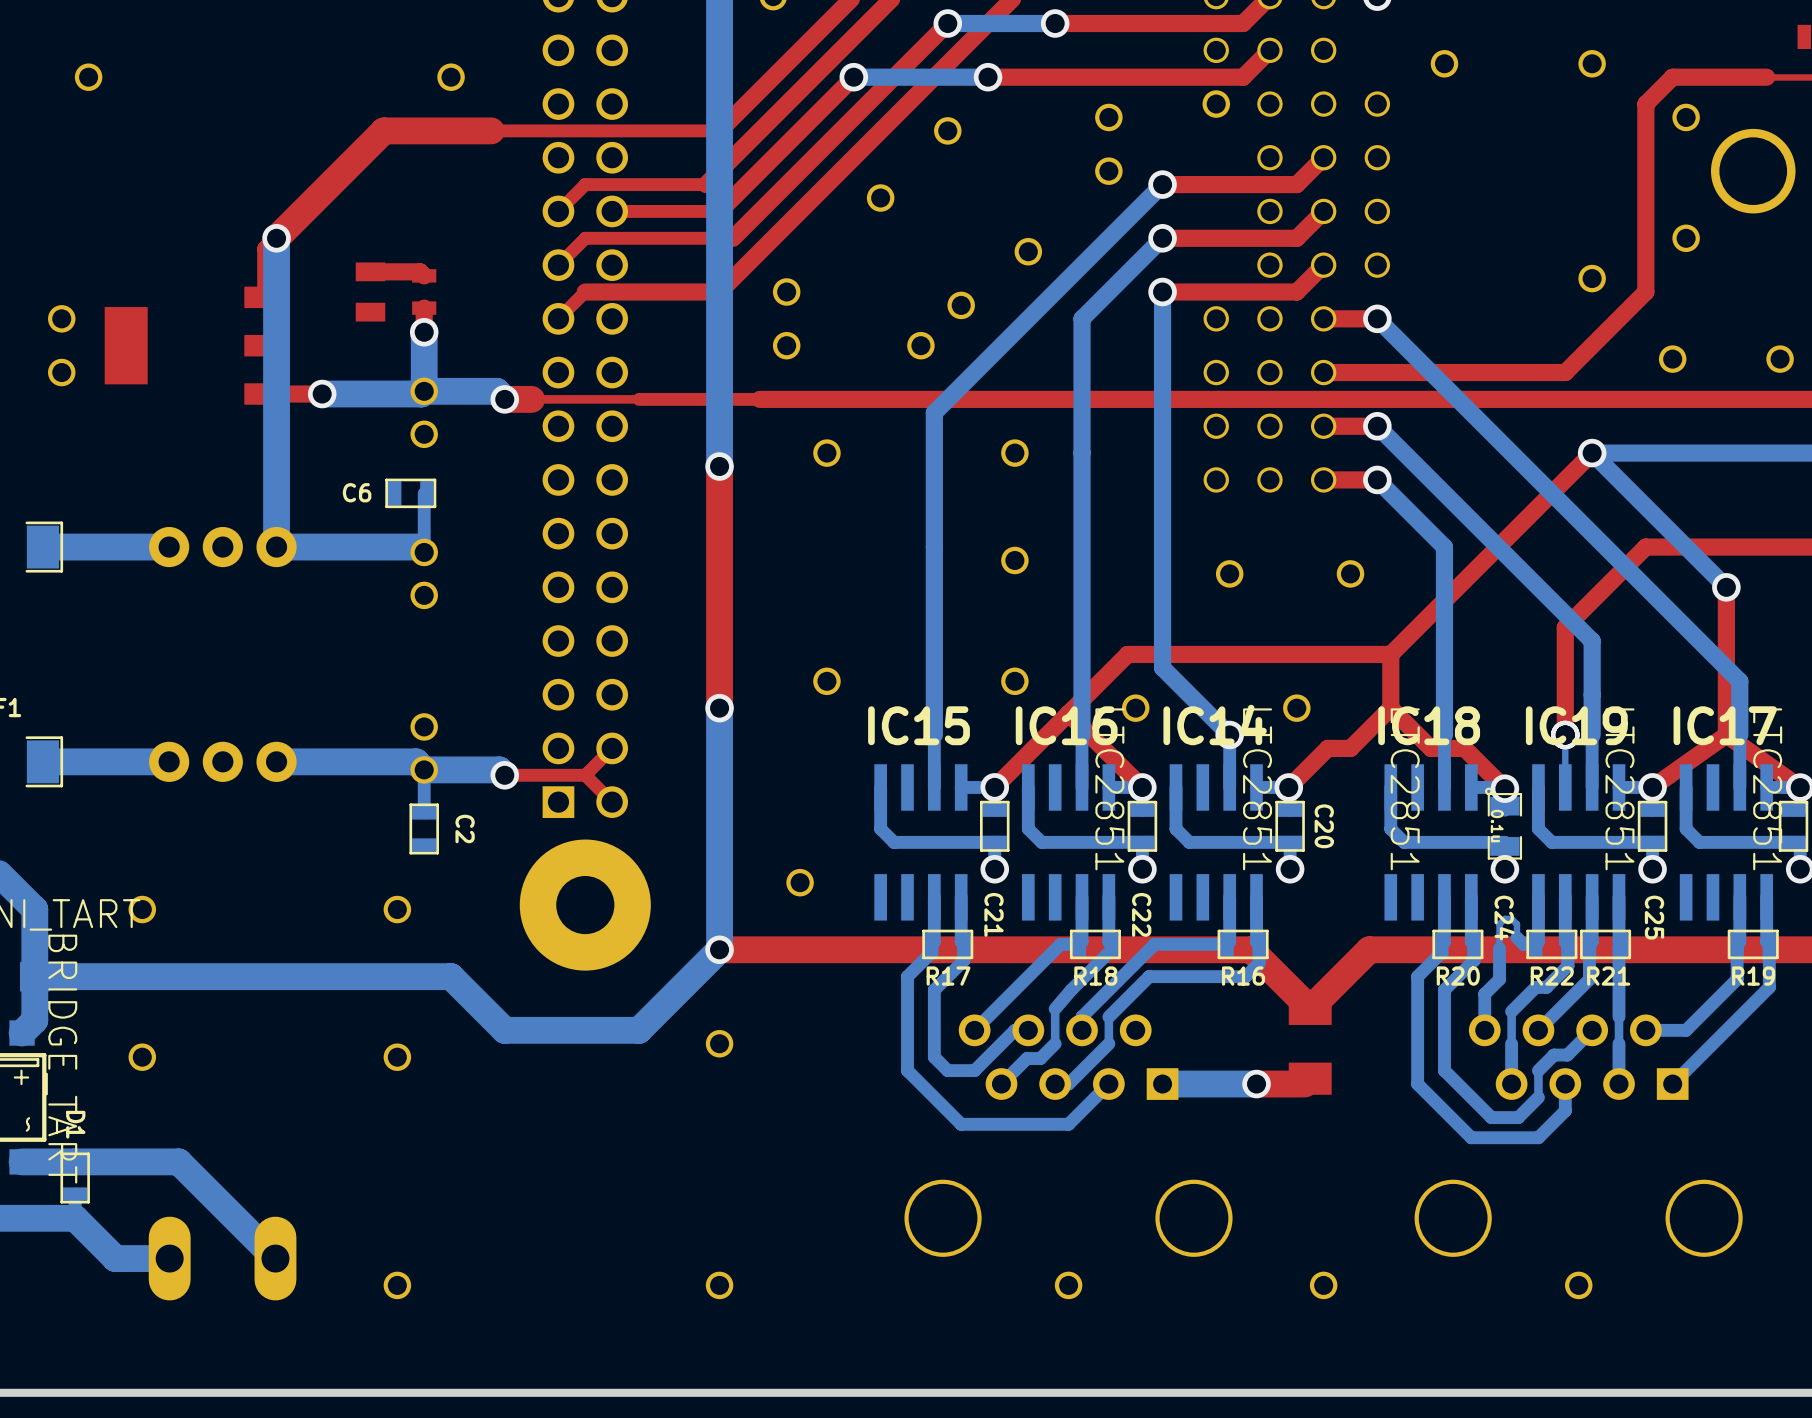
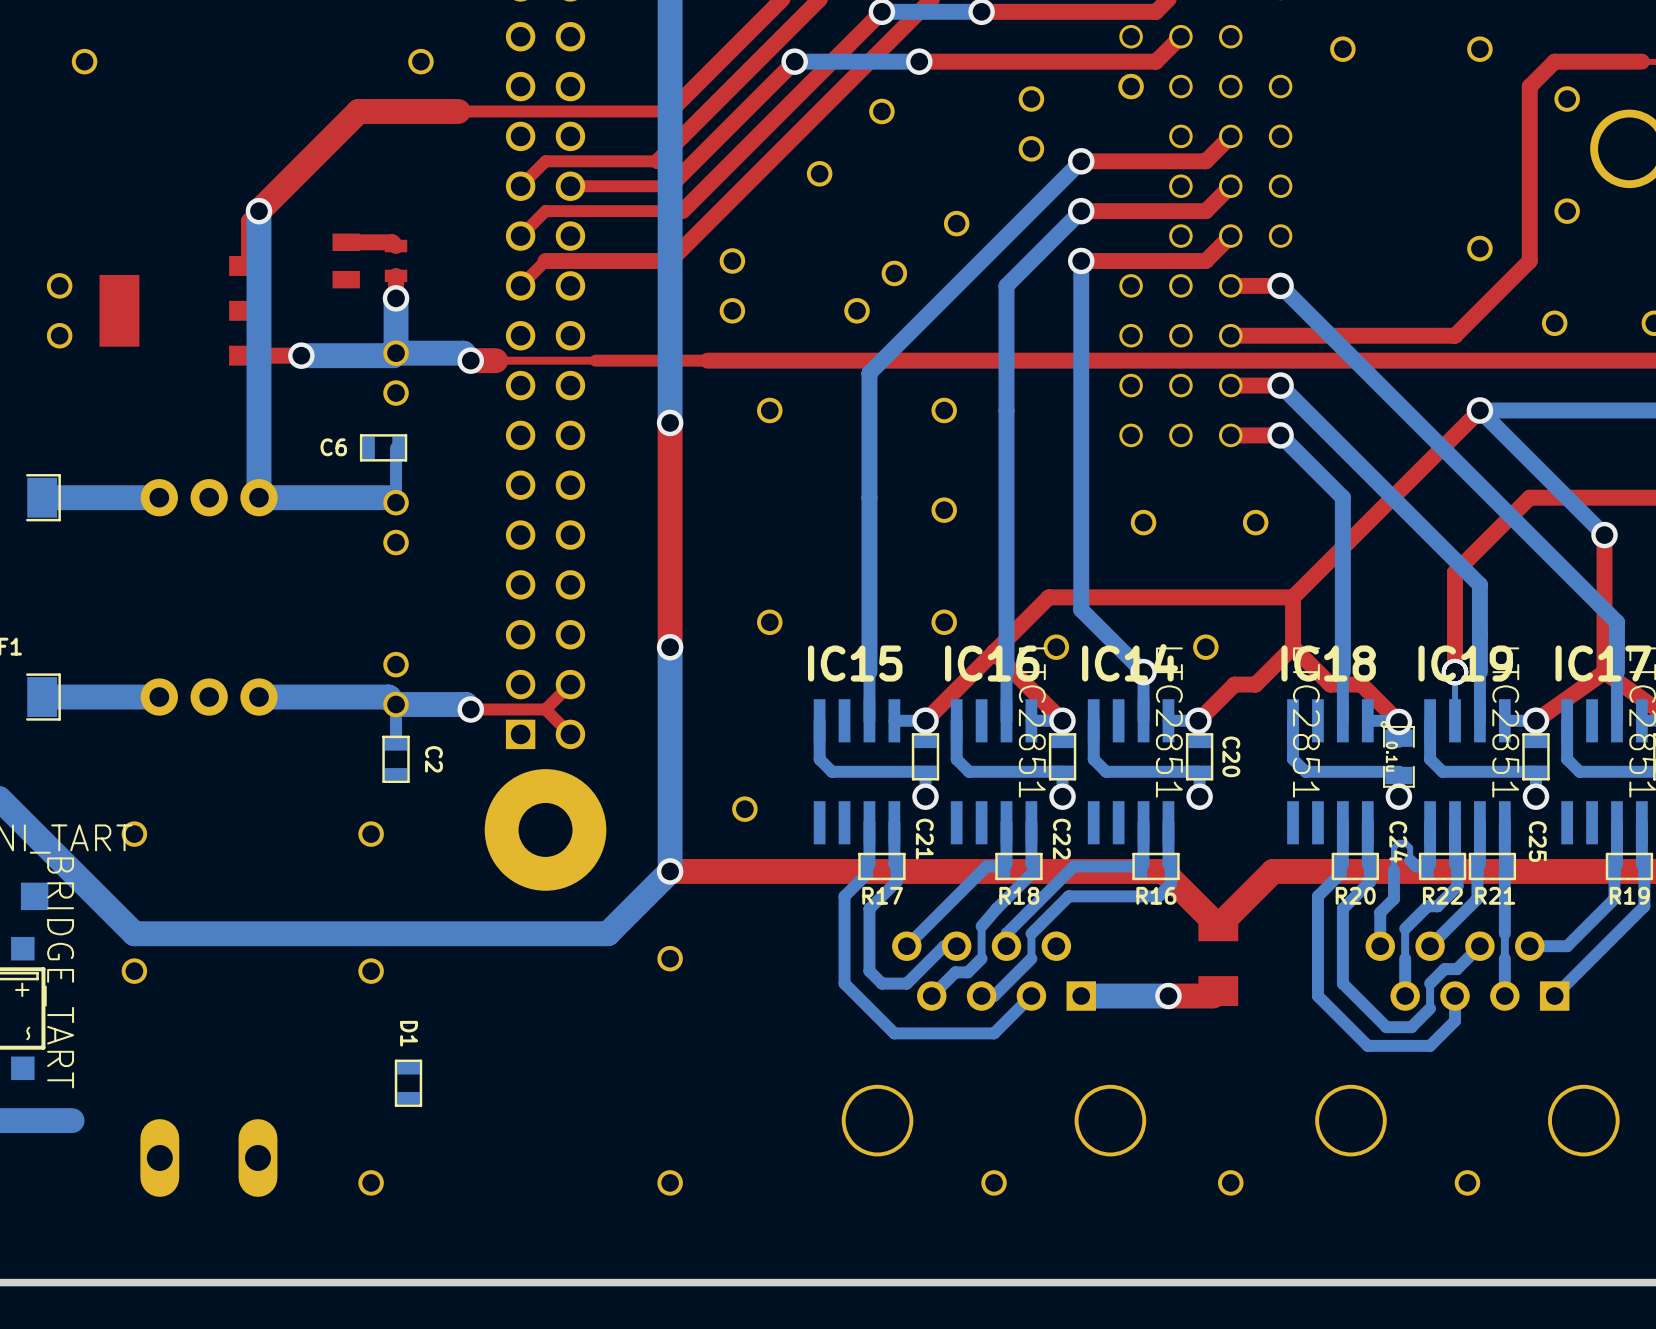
bottom track: (34, 909) (34, 1020) (22, 1033) -> none
bottom track: (34, 976) (451, 976) (504, 1030) (639, 1030) (652, 1016) -> (34, 833) (134, 933) (607, 933)
bottom track: (22, 1161) (178, 1161) (275, 1258) -> none
D1 position: (75, 1178) -> (408, 1083)
bottom track: (75, 1194) (75, 1218) (115, 1258) (169, 1258) -> none

